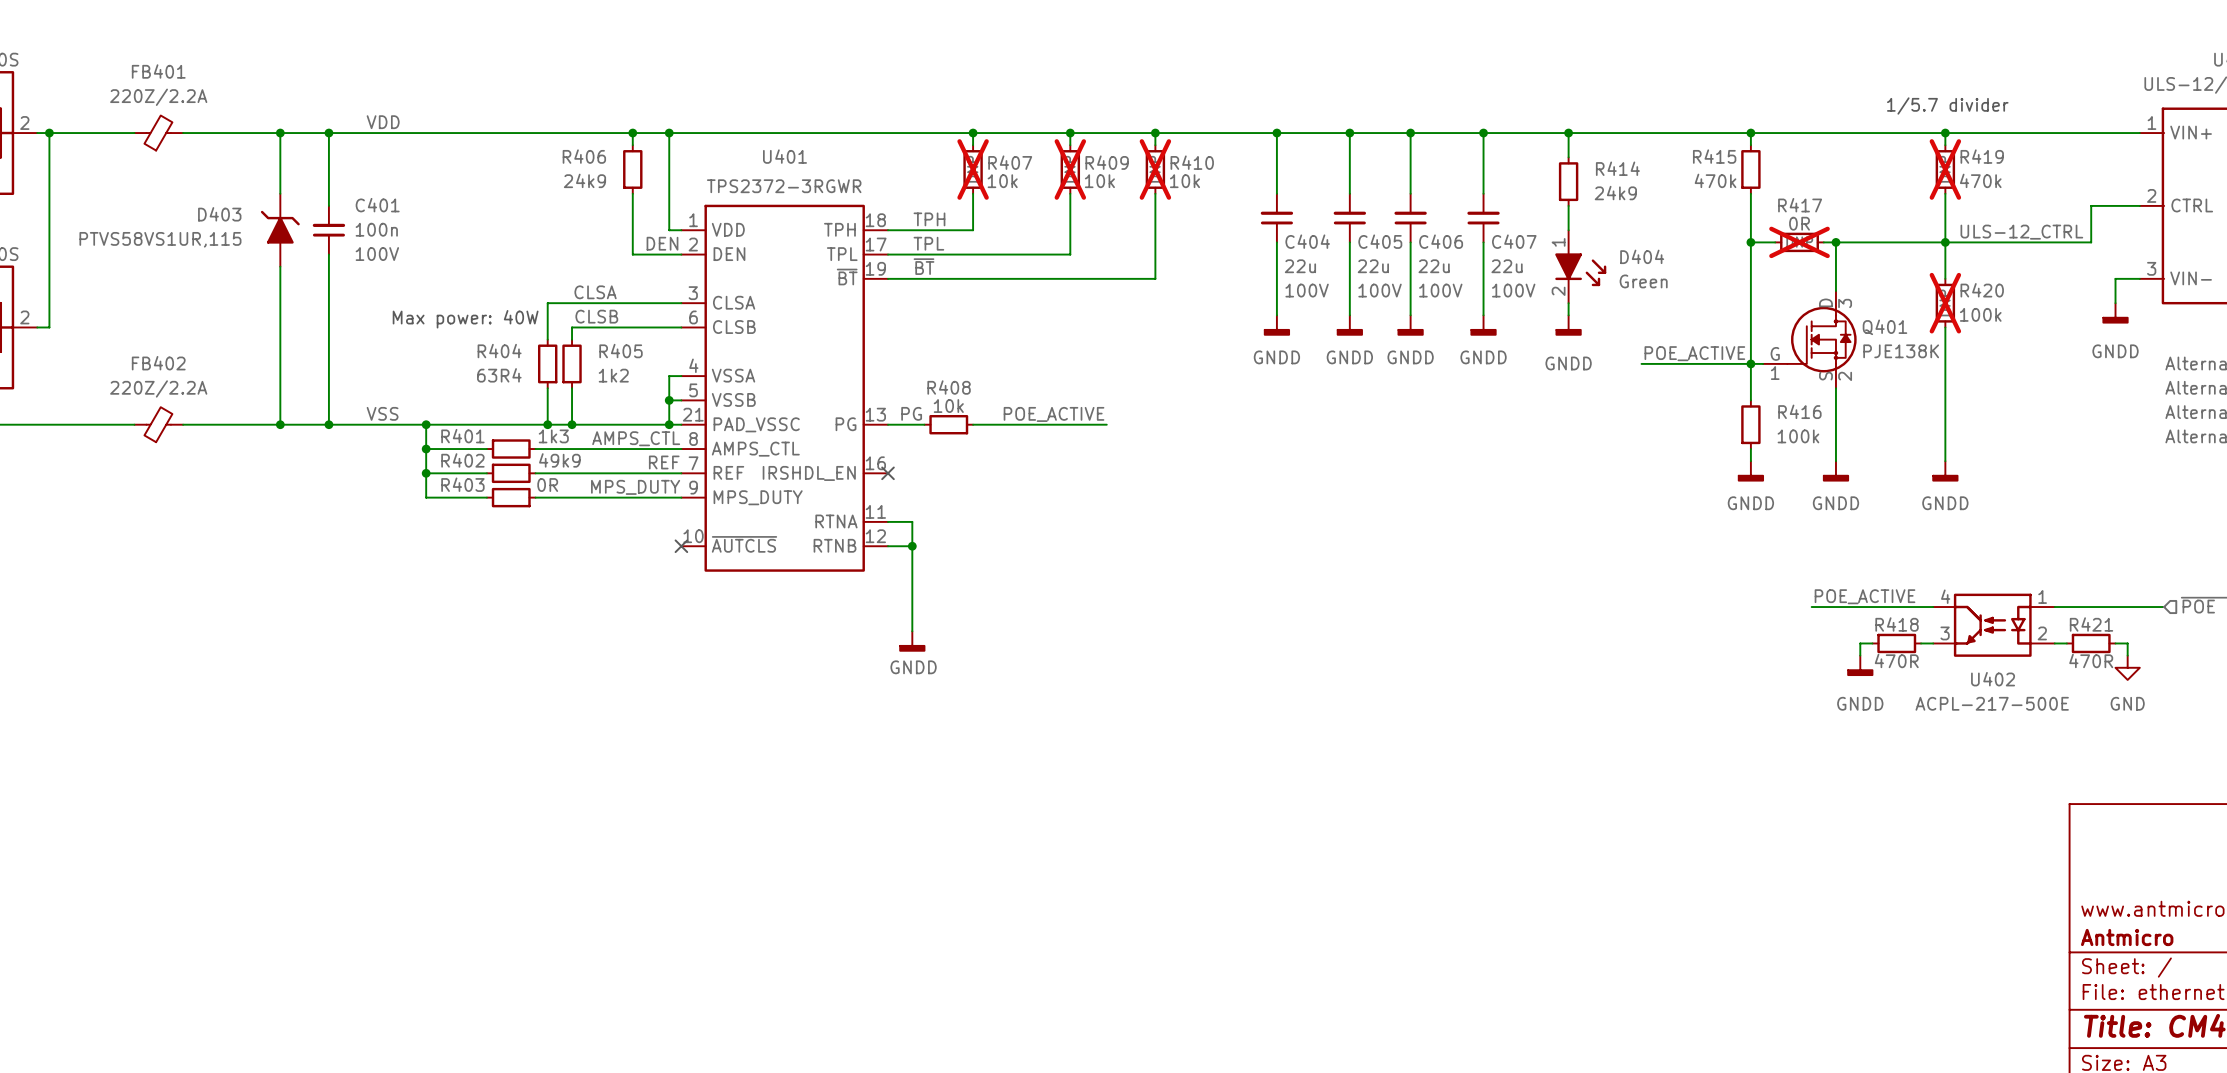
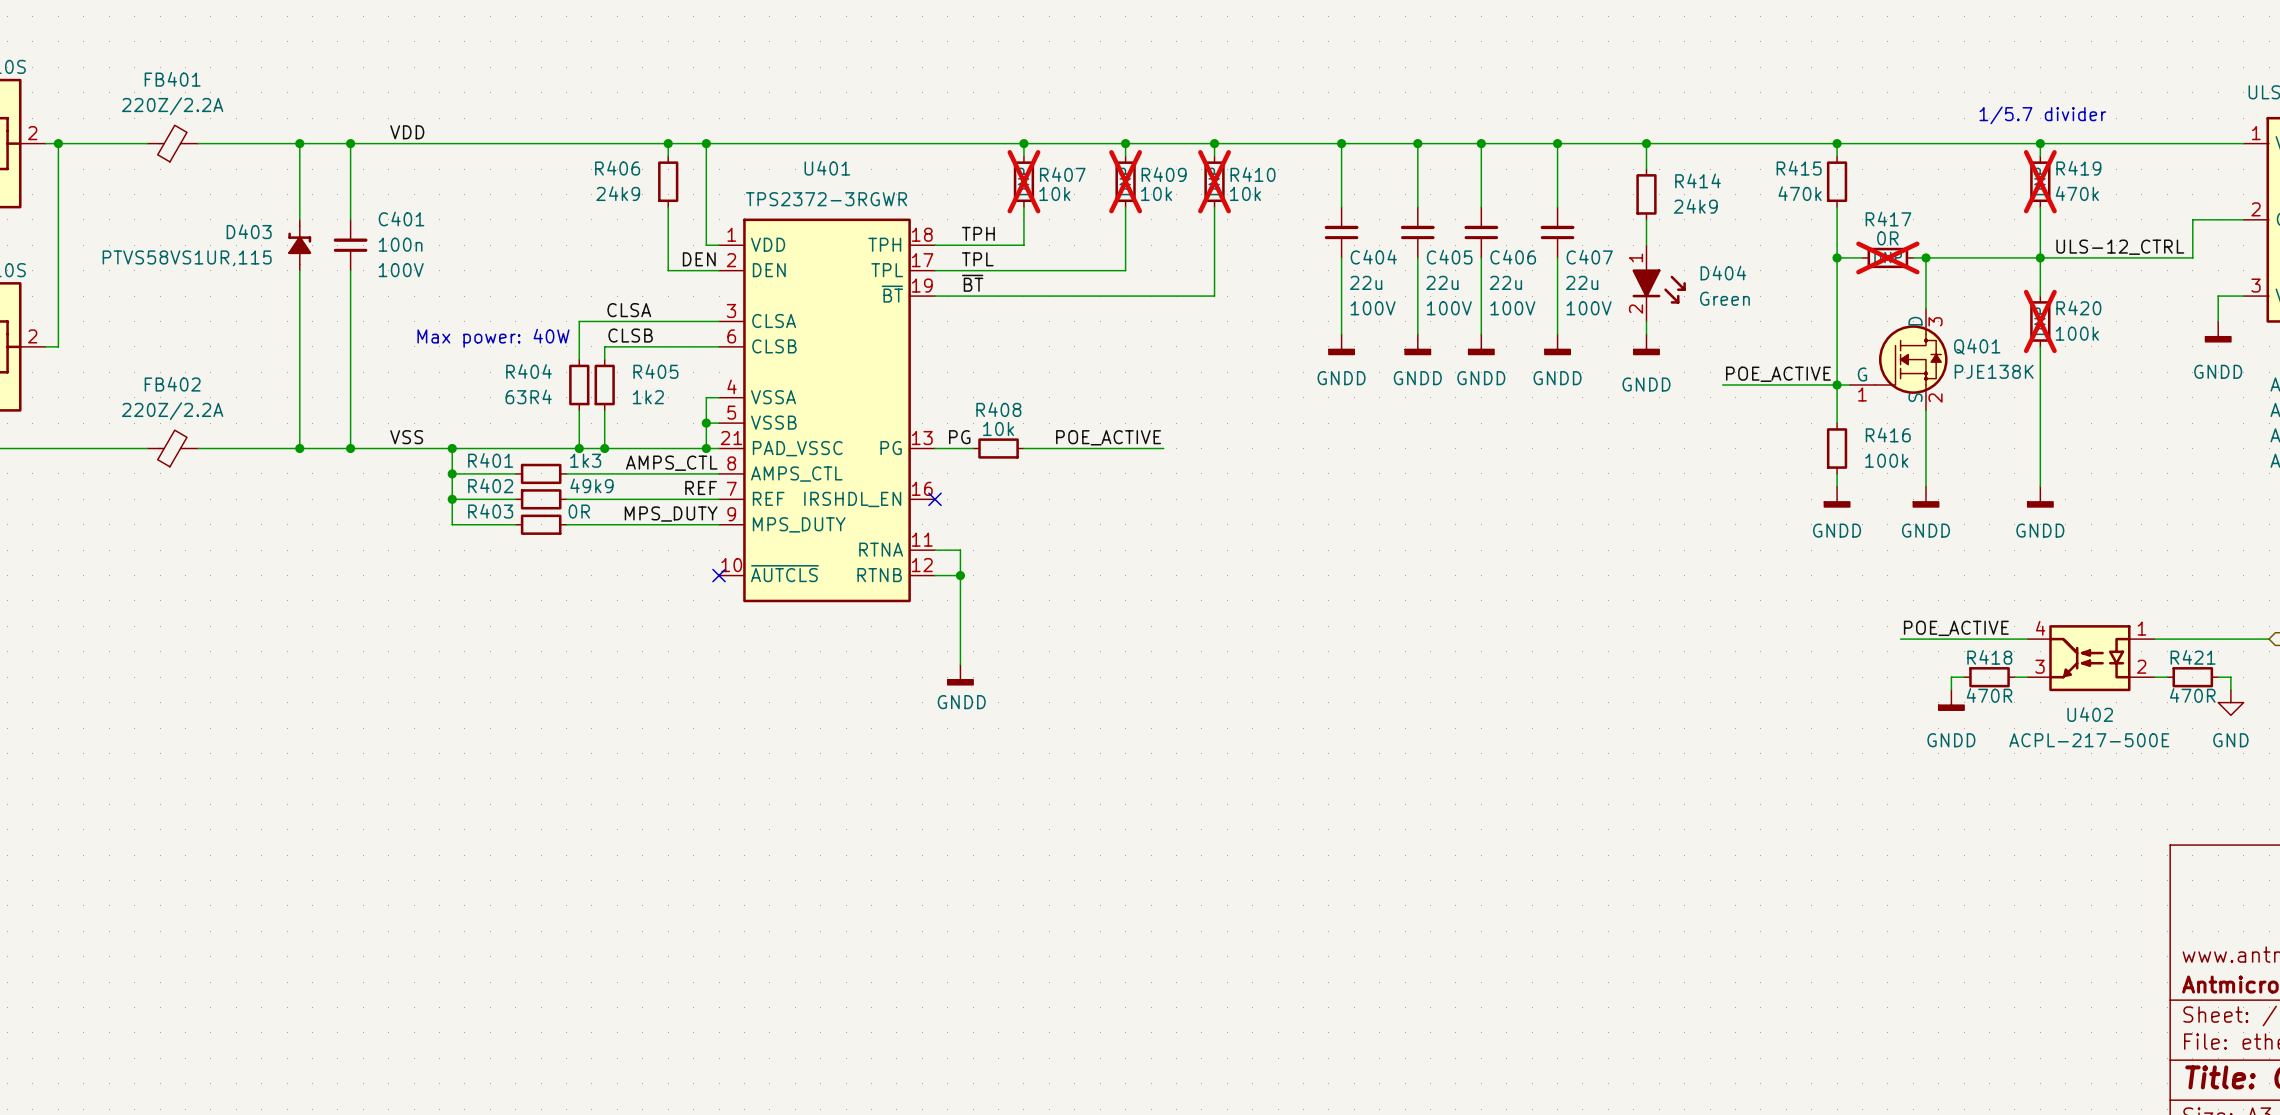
D403 symbol: [260, 193, 300, 267] -> [288, 219, 312, 271]

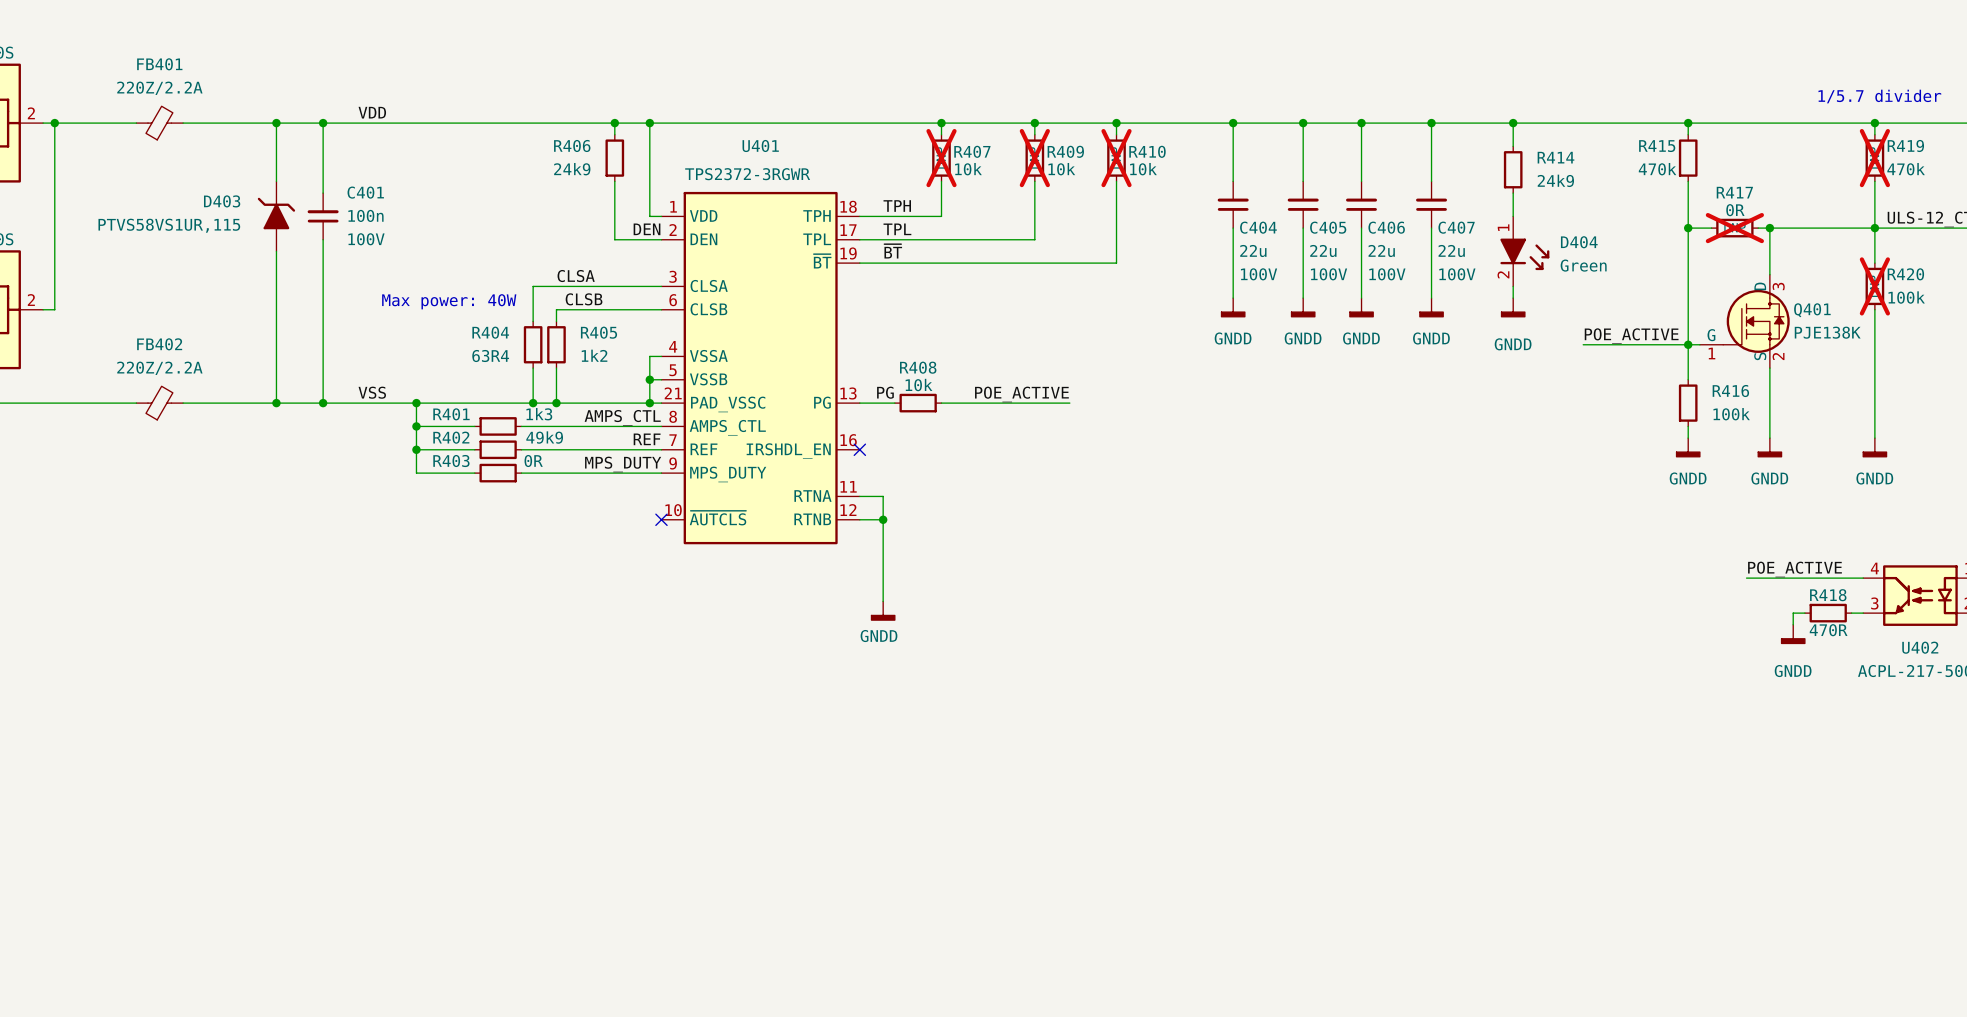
D403 symbol: [288, 219, 312, 271] -> [257, 181, 296, 252]

